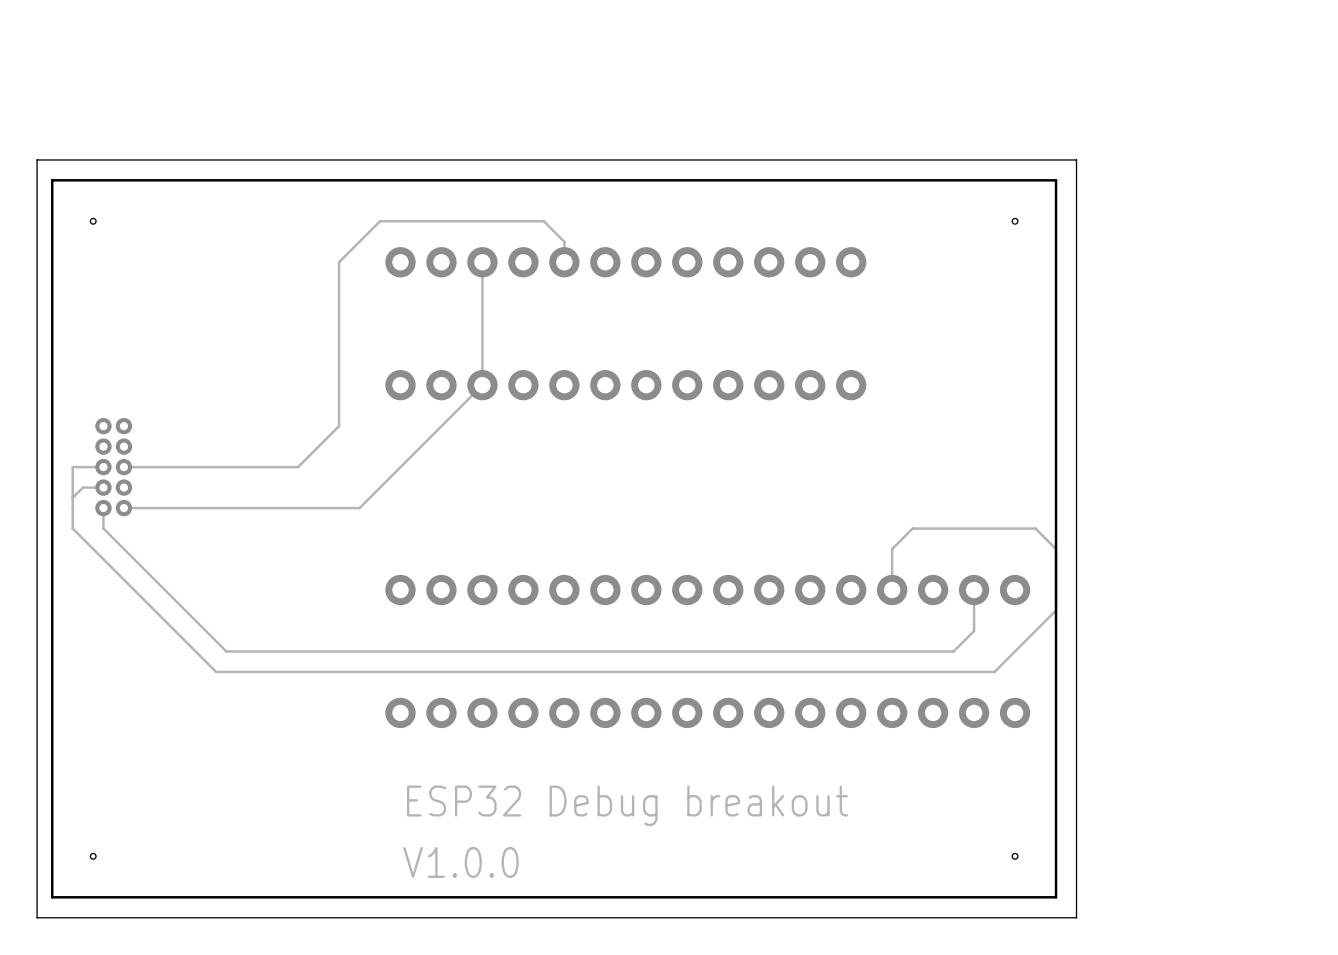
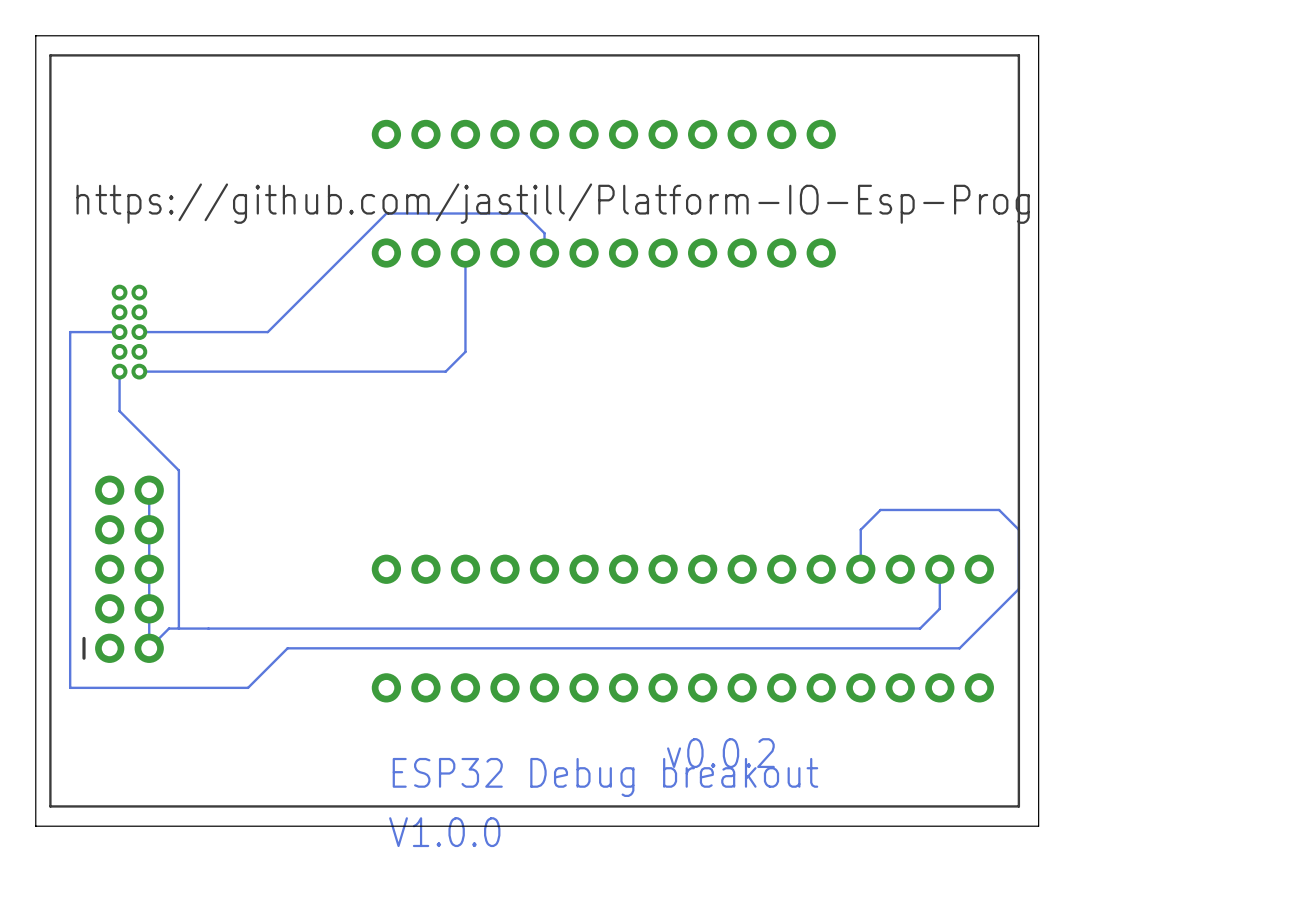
board edge: (1076, 159) (37, 159) -> (1038, 154) (1038, 35) (35, 35) (35, 154)
line: (1056, 180) (52, 180) -> (1018, 173) (1018, 55) (50, 55) (50, 173)
text: none -> https://github.com/jastill/Platform-IO-Esp-Prog (553, 203)
hole: (93, 221) -> none
track: (400, 221) (380, 221) (339, 262) (339, 426) (298, 467) (123, 467) -> (386, 213) (267, 332) (139, 332)
hole: (1015, 221) -> none
track: (482, 364) (482, 385) (359, 508) (164, 508) -> (465, 351) (445, 371) (139, 371)
track: none -> (119, 371) (119, 411) (178, 470) (178, 628)
part position: (625, 385) -> (603, 134)
track: (103, 467) (72, 467) -> (119, 332) (70, 332) (70, 450)
part position: (113, 467) -> (129, 332)
track: (103, 487) (82, 487) (72, 497) -> none
track: (103, 508) (103, 528) (226, 651) -> (149, 490) (149, 648) (168, 628) (218, 628)
track: (154, 508) (123, 508) -> none
track: (72, 528) (216, 671) (298, 671) -> (70, 509) (70, 687) (248, 687) (287, 648)
part: none -> (123, 569)
text: none -> v0.0.2 (720, 753)
line: (1056, 835) (1056, 897) (52, 897) (52, 835) -> (1018, 806) (50, 806)
hole: (93, 856) -> none
hole: (1015, 856) -> none
board edge: (1076, 856) (1076, 917) (37, 917) (37, 856) -> (1038, 826) (35, 826)

